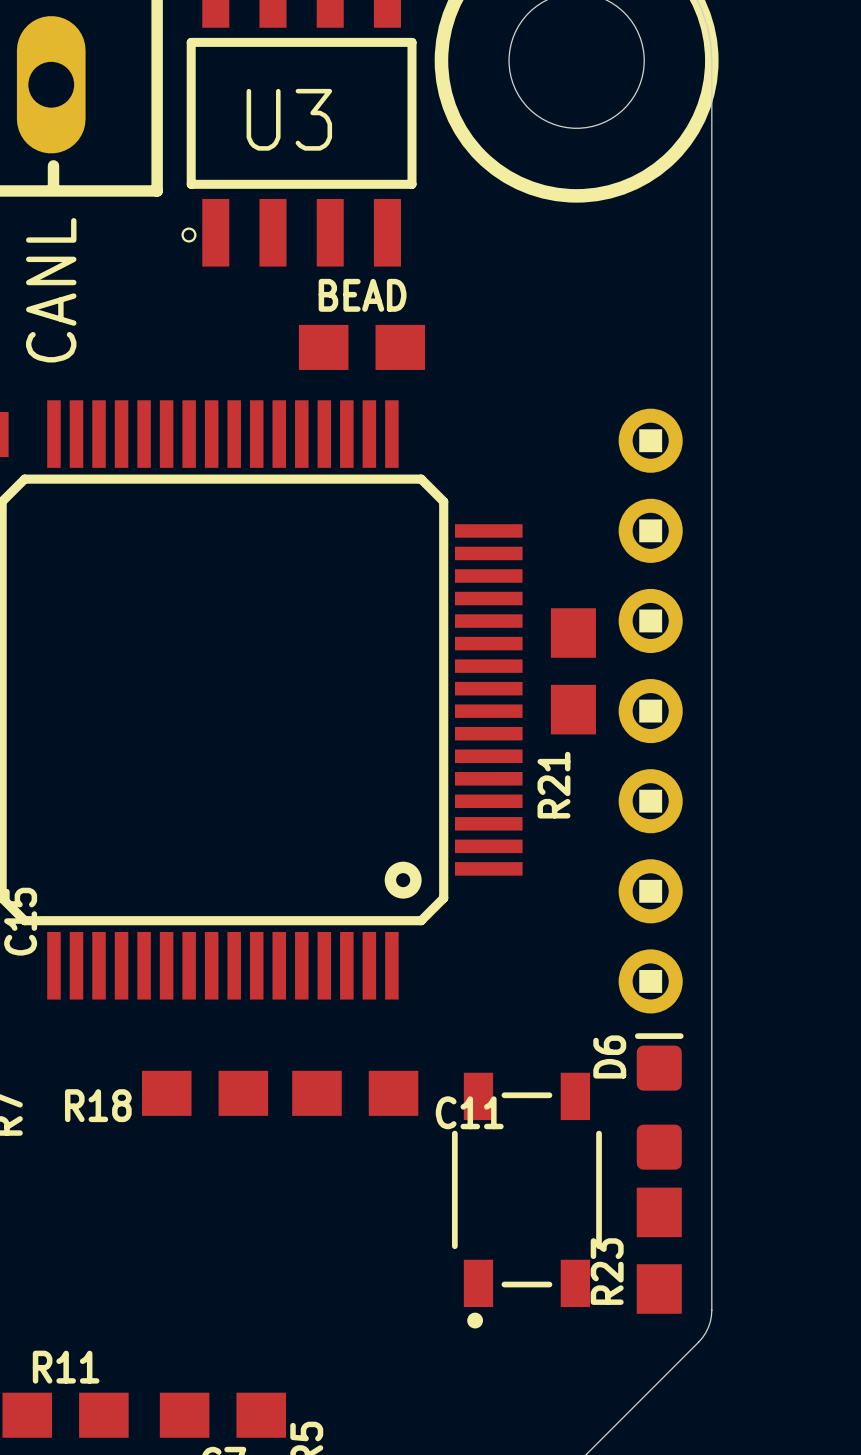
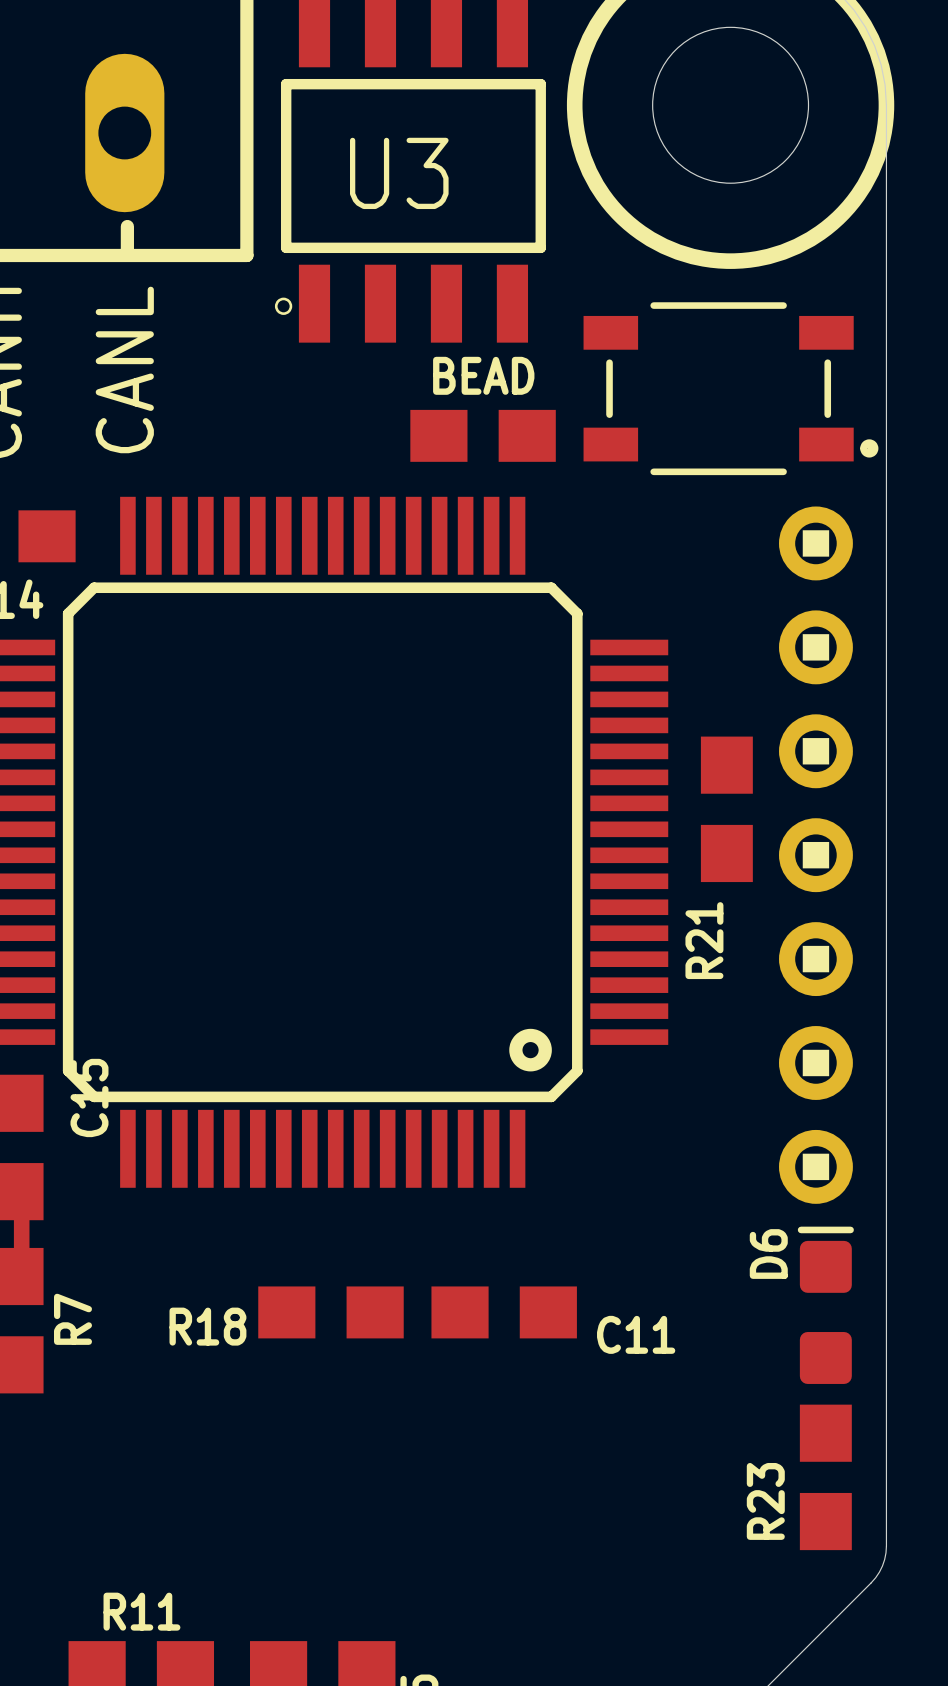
R18 position: (205, 1093) -> (330, 1312)
C11 position: (355, 1093) -> (504, 1312)
part rotation: 0° (526, 1200) -> 90° counterclockwise (730, 388)
part position: (526, 1200) -> (730, 388)

